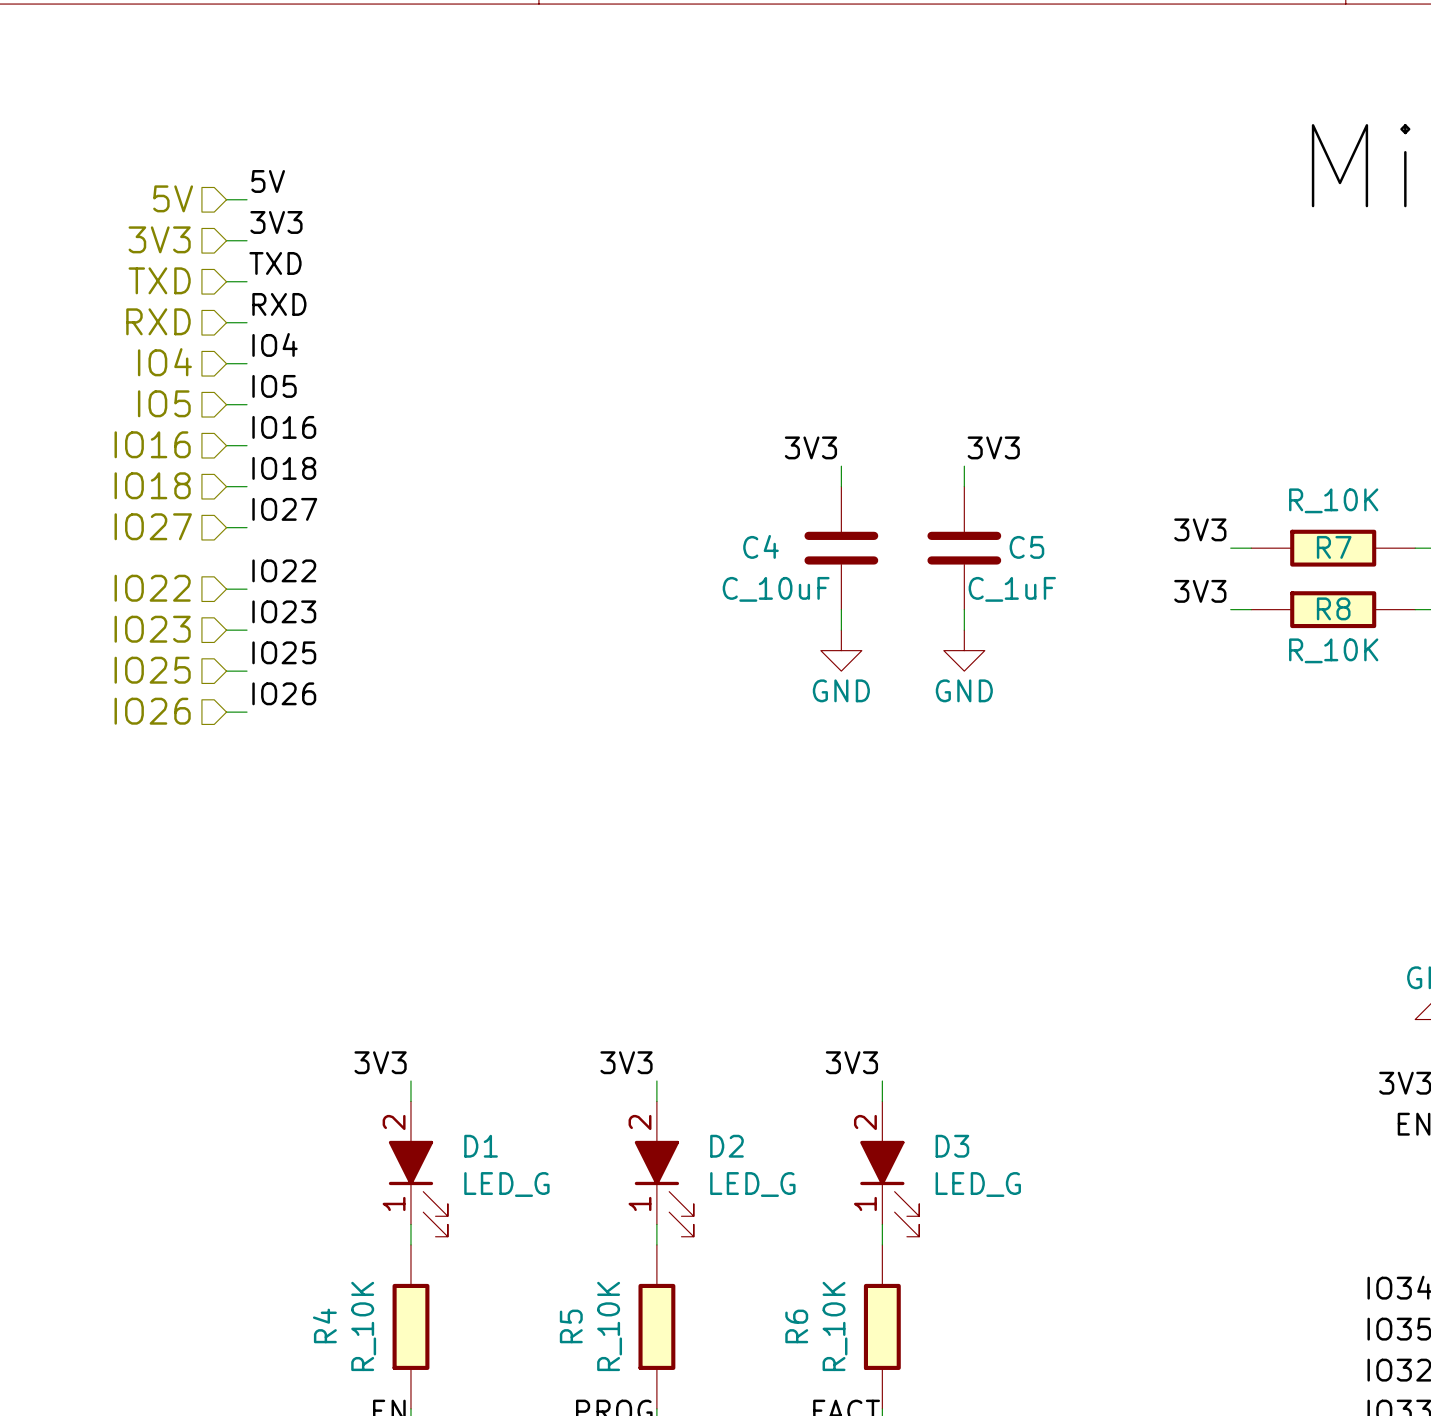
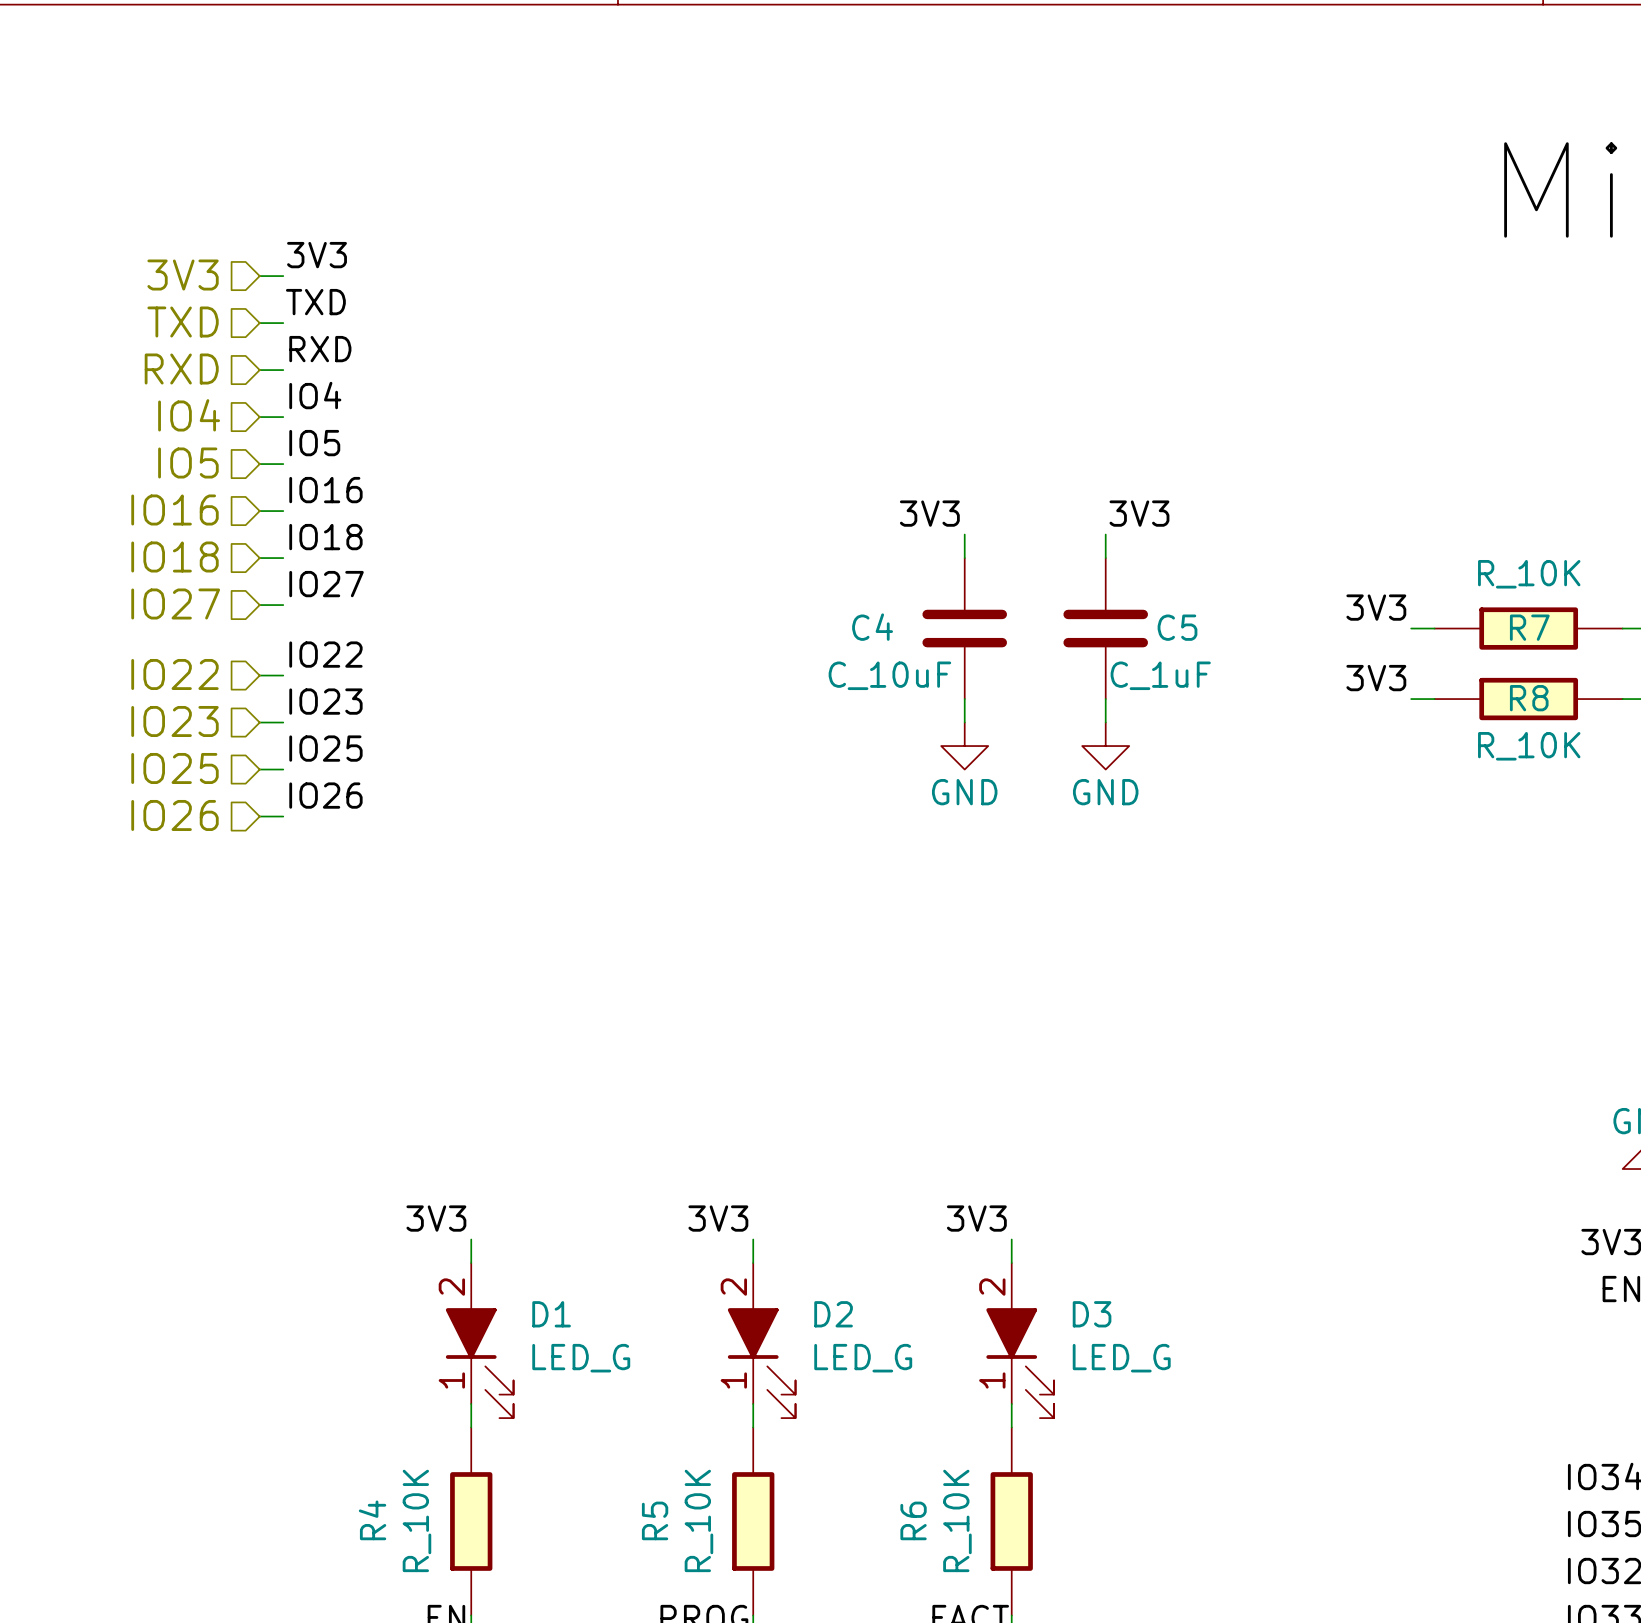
label: 5V (268, 181) -> none
hierarchical label: 5V (173, 198) -> none
wire: (226, 199) (247, 199) -> none

